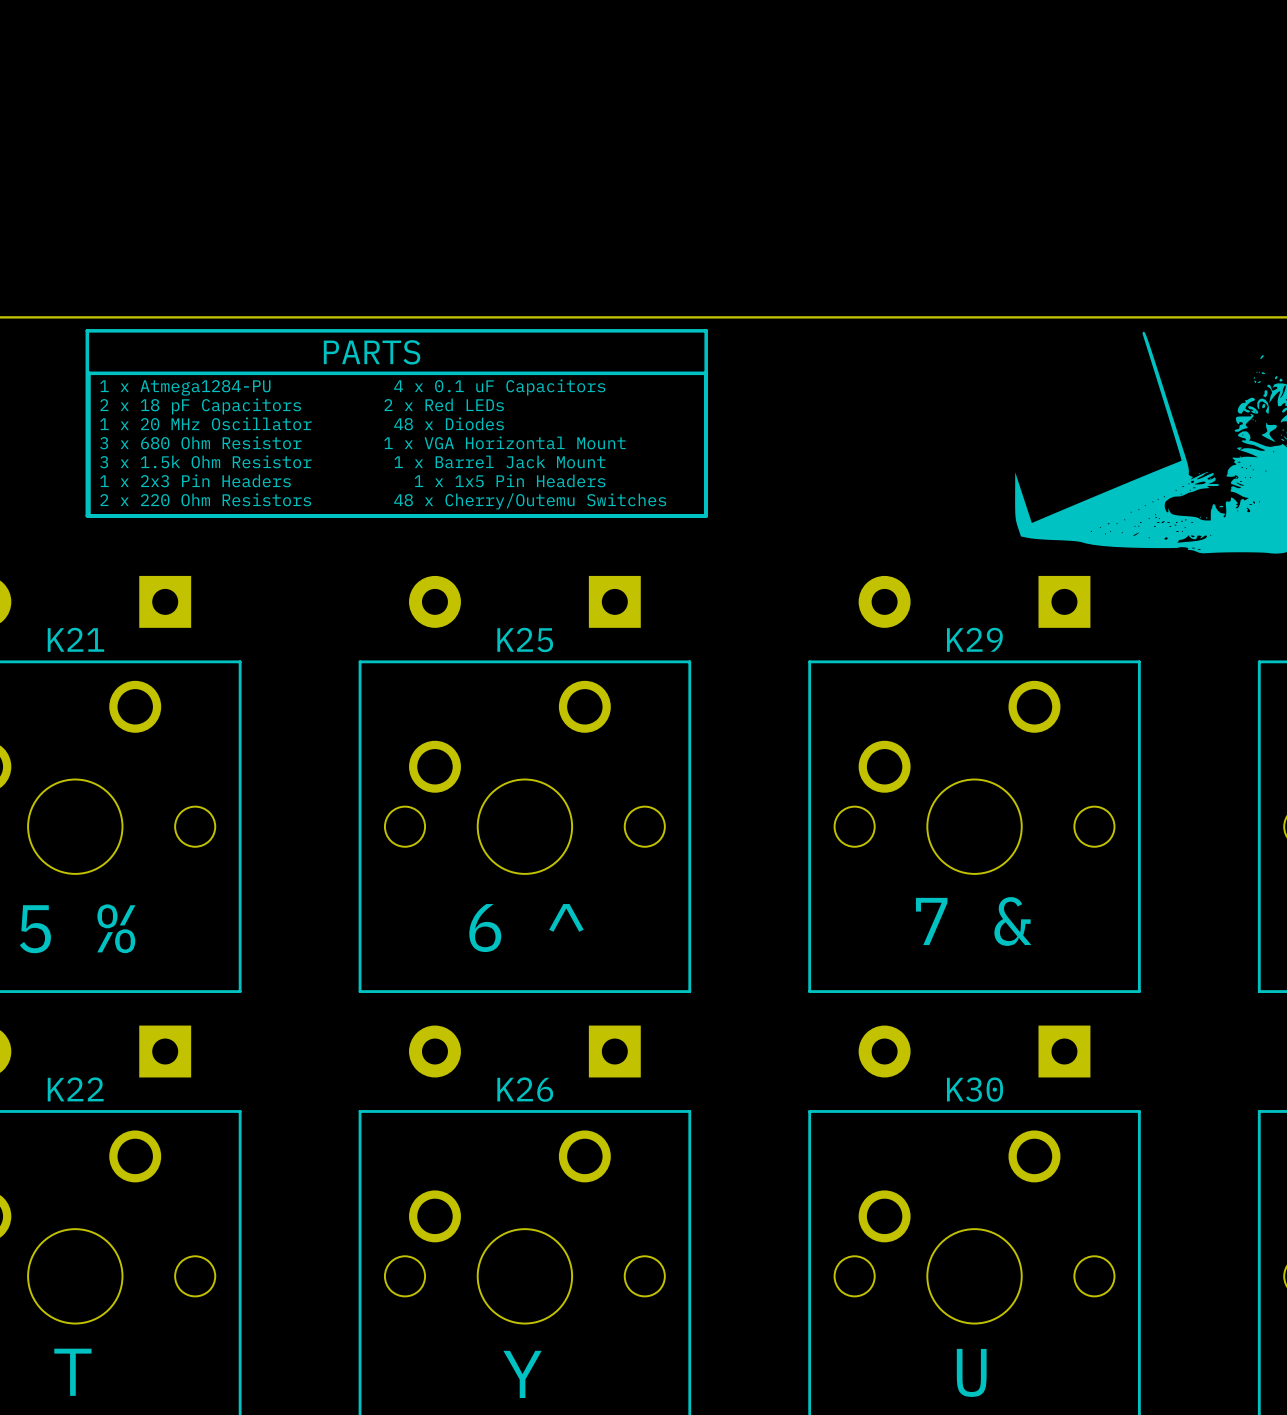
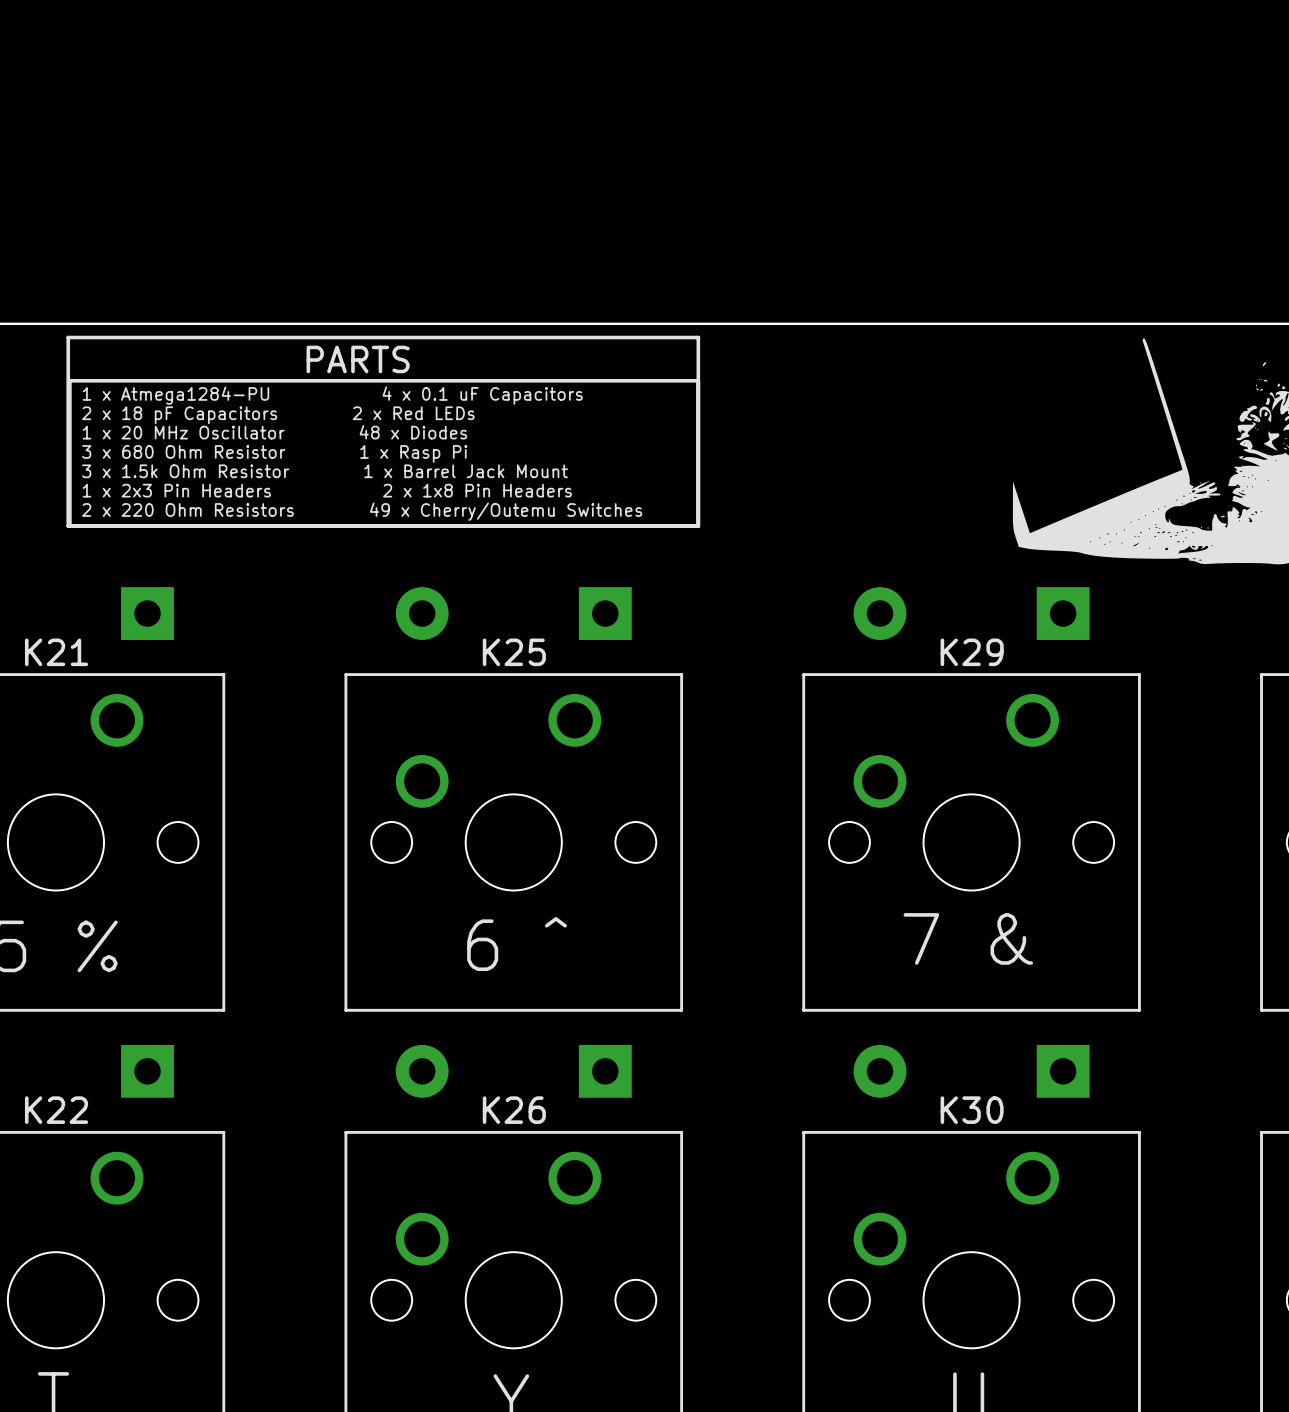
text: 3 x 680 Ohm Resistor 1 x VGA Horizontal Mount (362, 442) -> 3 x 680 Ohm Resistor 1 x Rasp Pi (274, 453)
text: 1 x 2x3 Pin Headers 1 x 1x5 Pin Headers (352, 480) -> 1 x 2x3 Pin Headers 2 x 1x8 Pin Headers (327, 490)
text: 2 x 220 Ohm Resistors 48 x Cherry/Outemu Switches (383, 501) -> 2 x 220 Ohm Resistors 49 x Cherry/Outemu Switches (362, 511)

